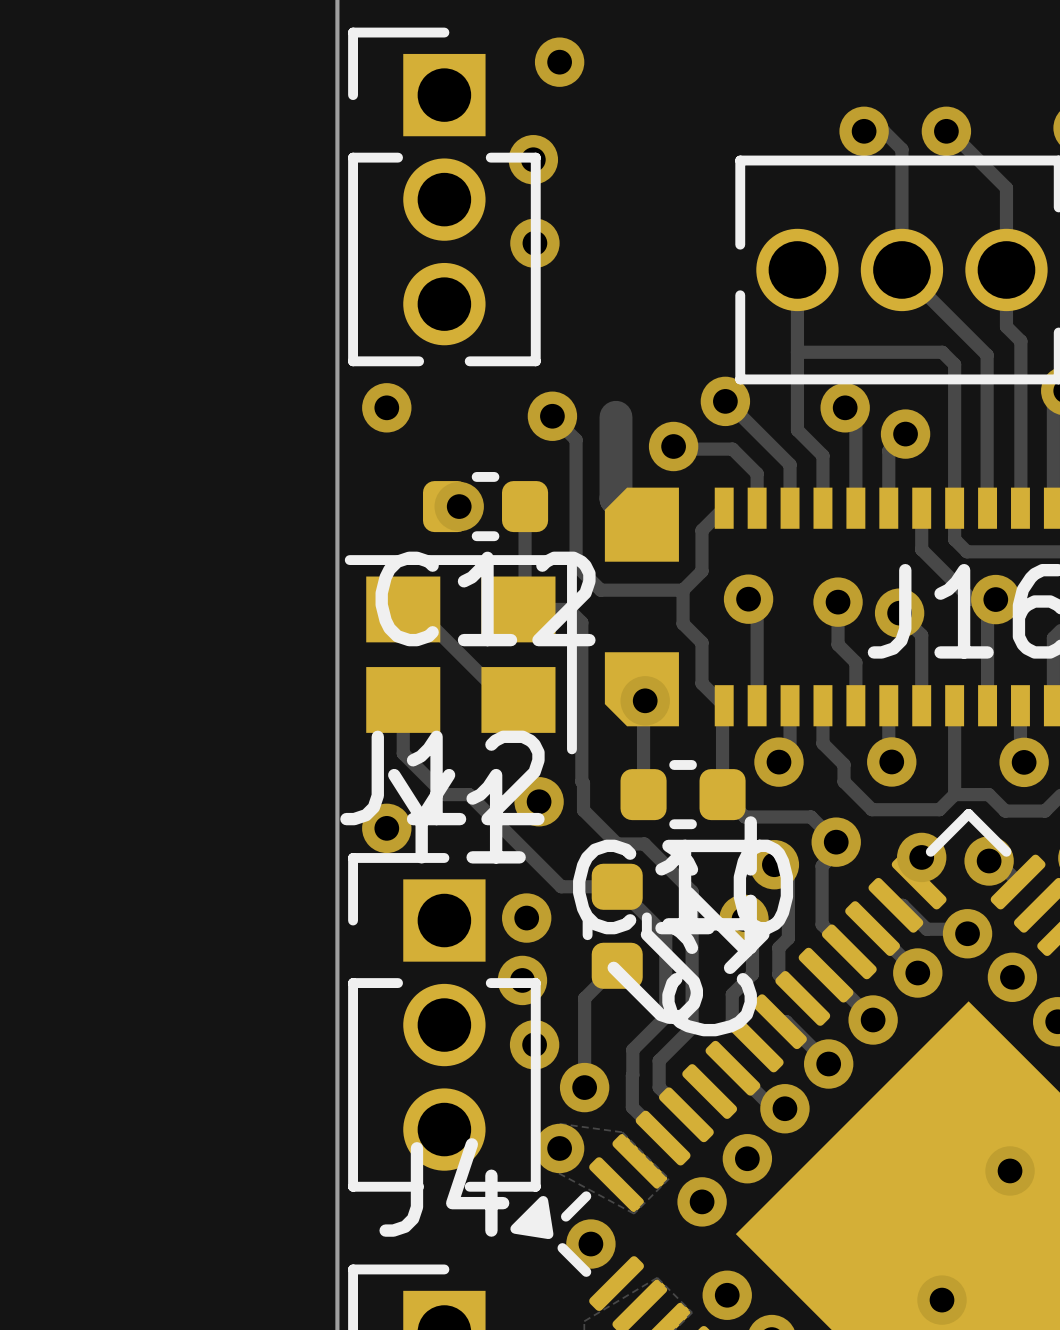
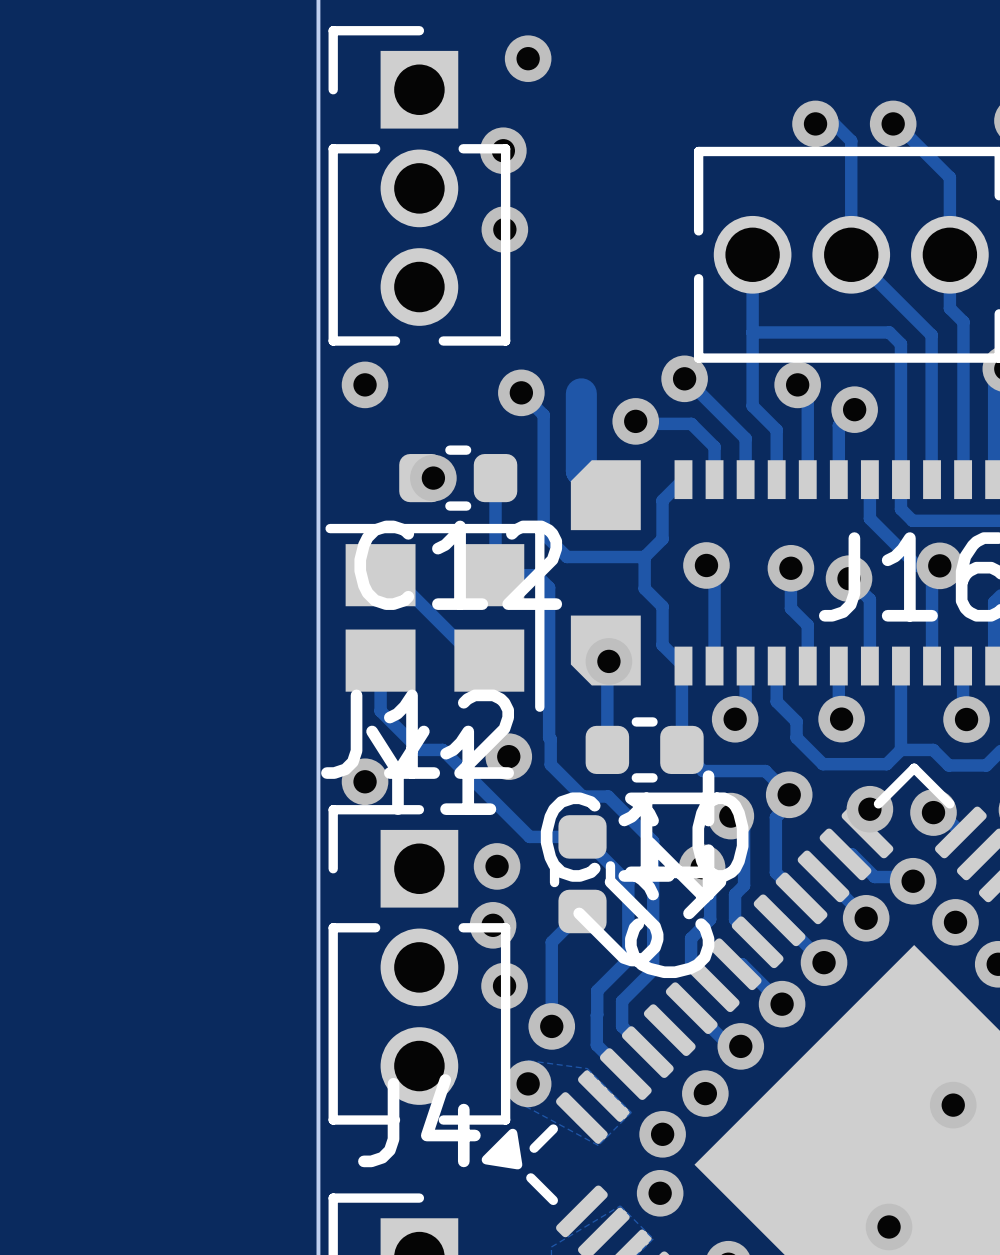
via: (590, 1244) -> none
via position: (727, 1295) -> (660, 1193)

